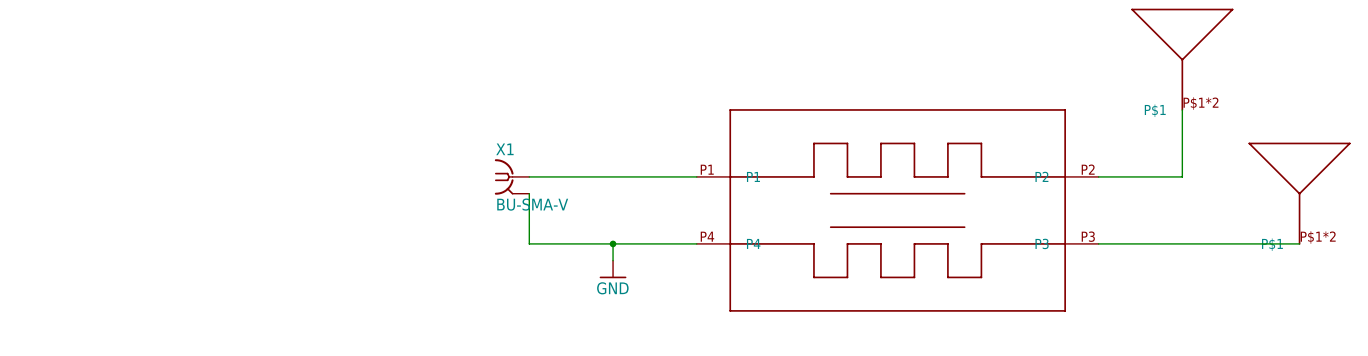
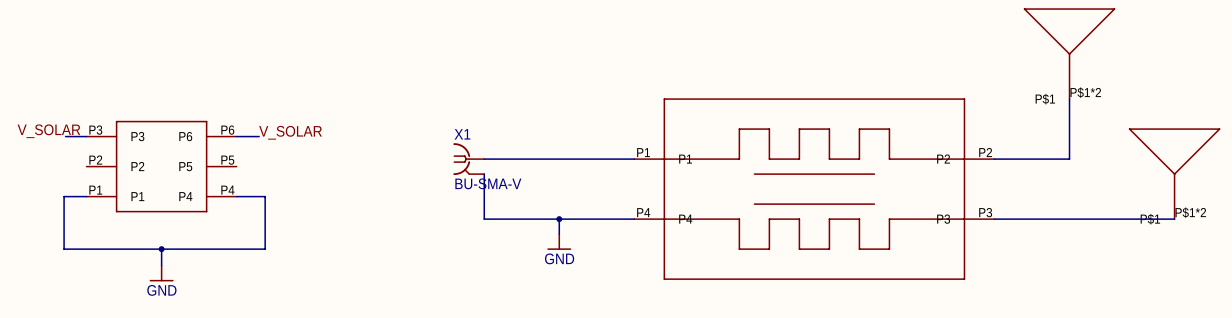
label: none -> V_SOLAR (48, 131)
label: none -> V_SOLAR (290, 132)
wire: none -> (65, 136) (86, 136)
wire: none -> (236, 136) (259, 136)
part: none -> (161, 166)
wire: none -> (86, 196) (64, 196) (64, 249) (265, 249) (265, 196) (236, 196)
wire: none -> (161, 249) (161, 265)
junction: none -> (161, 249)
power symbol: none -> GND (161, 273)

